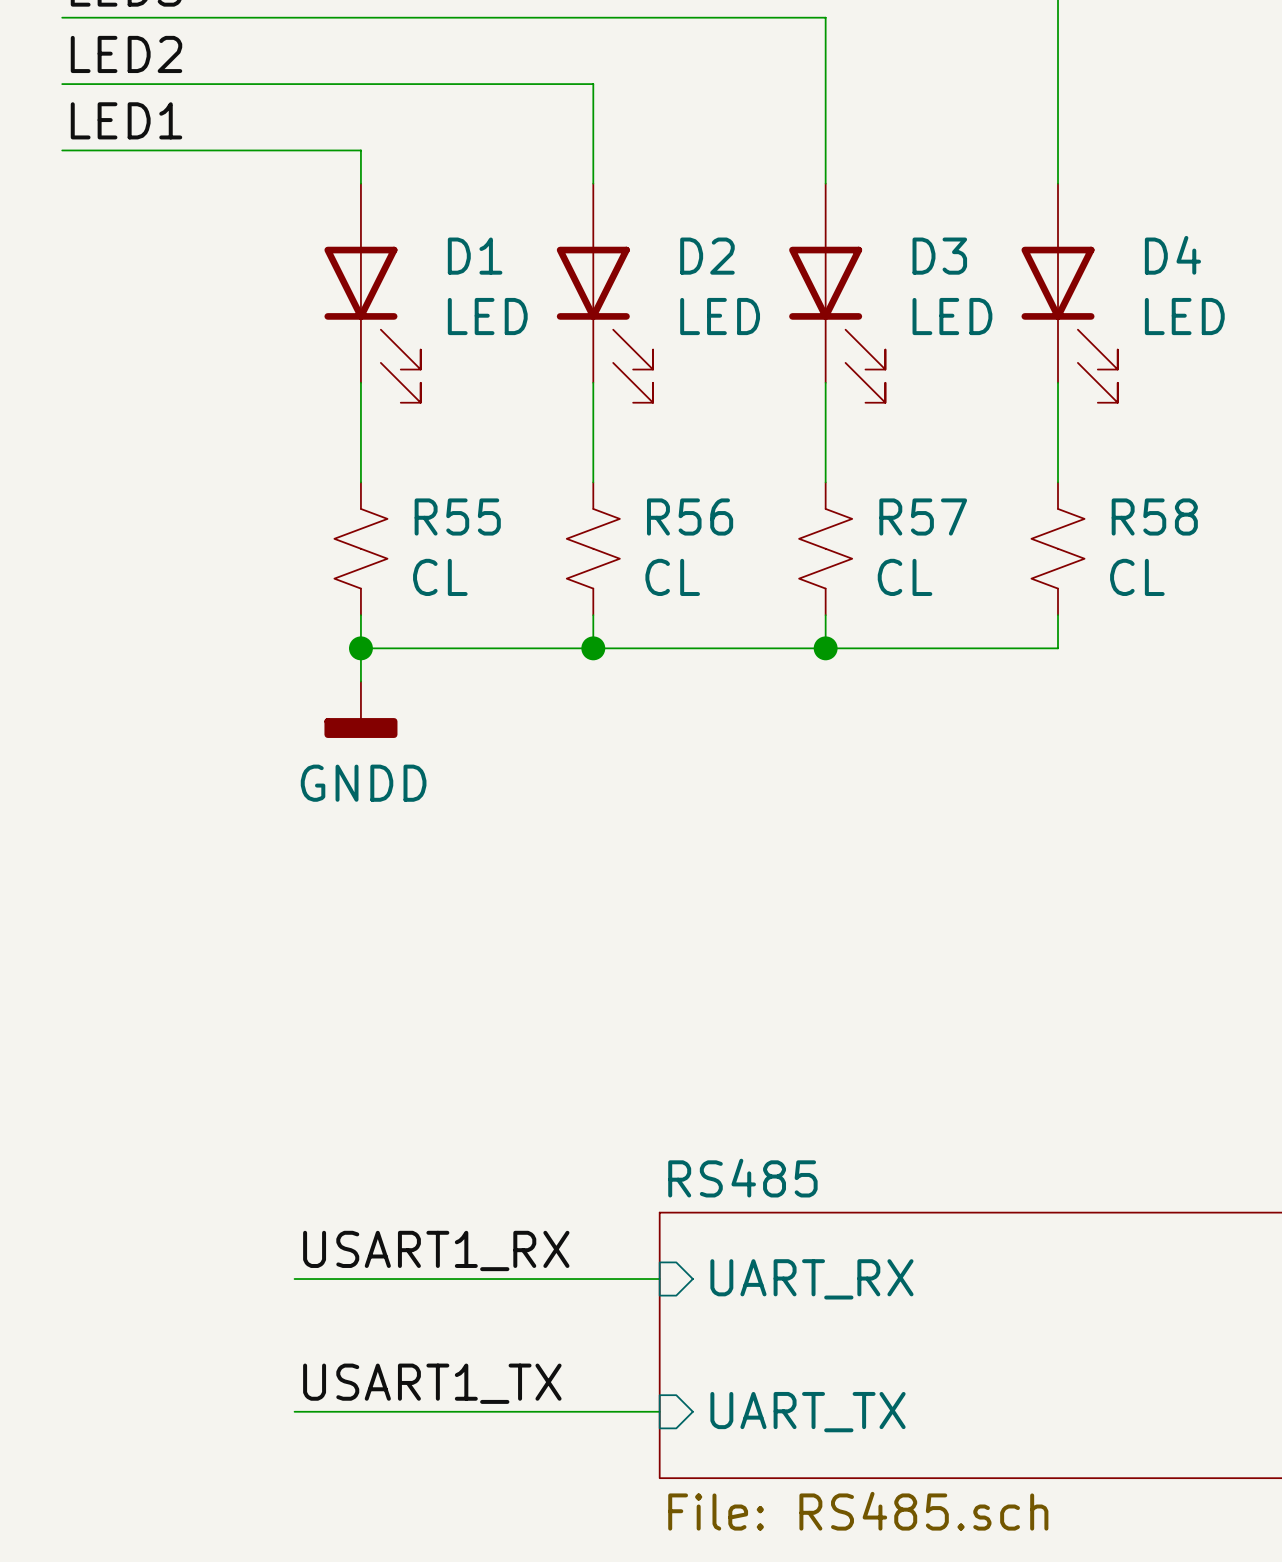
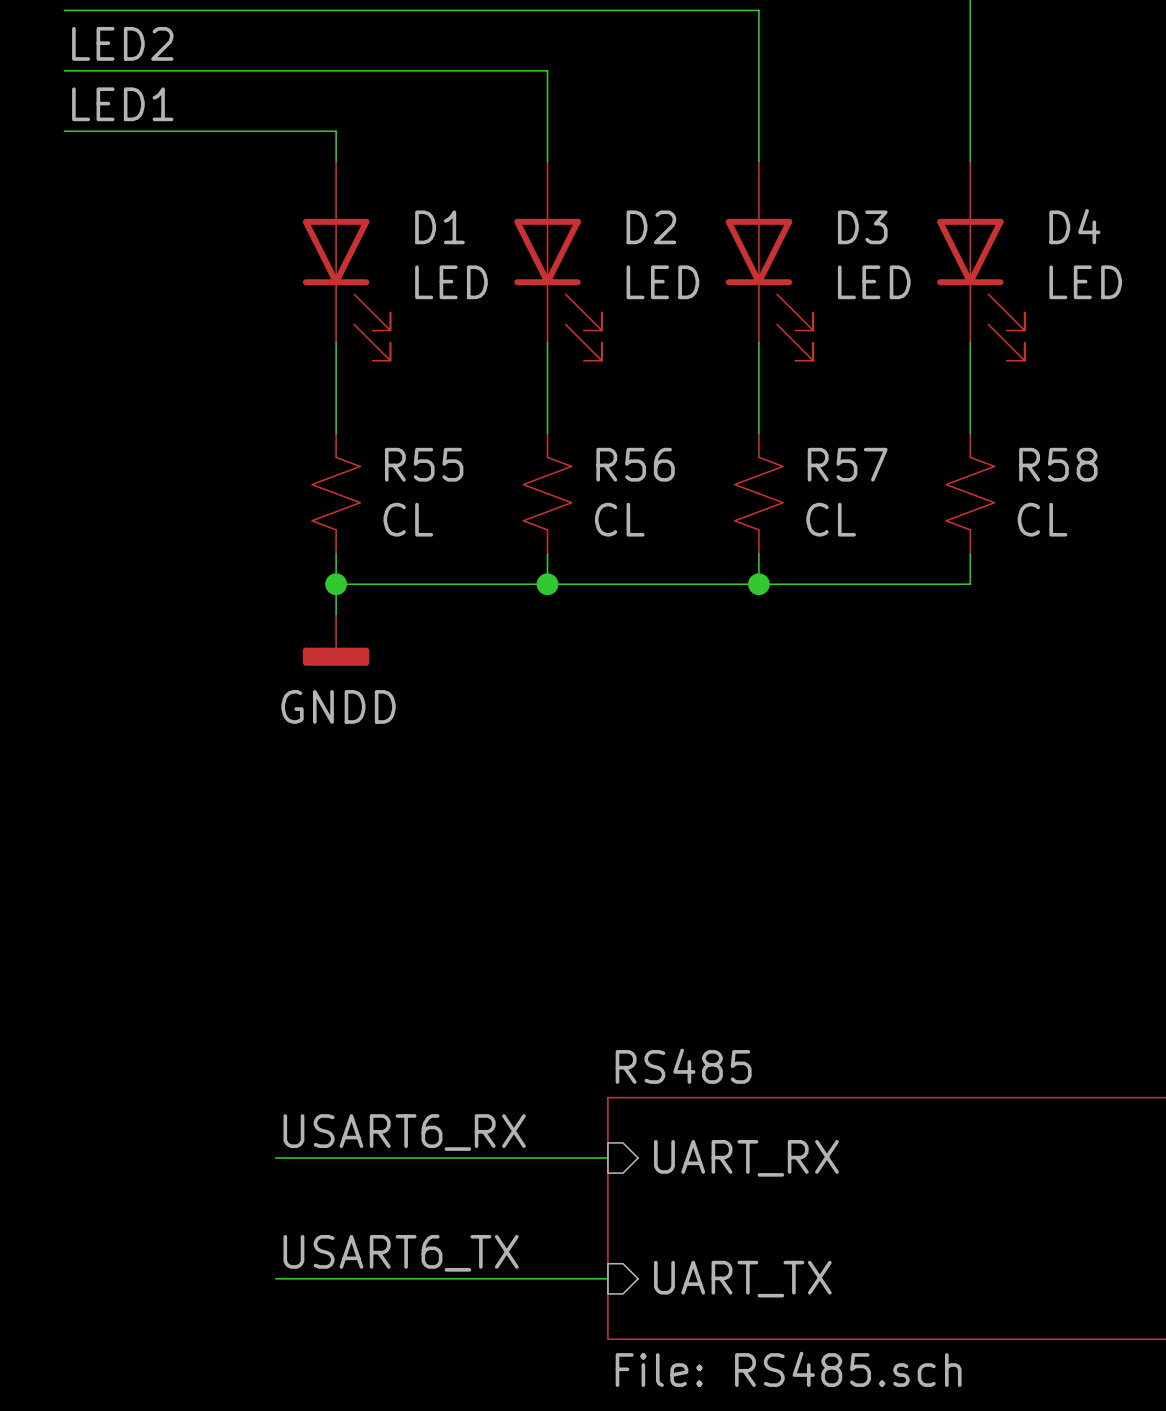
label: USART1_RX (436, 1250) -> USART6_RX (404, 1132)
label: USART1_TX (432, 1383) -> USART6_TX (401, 1253)

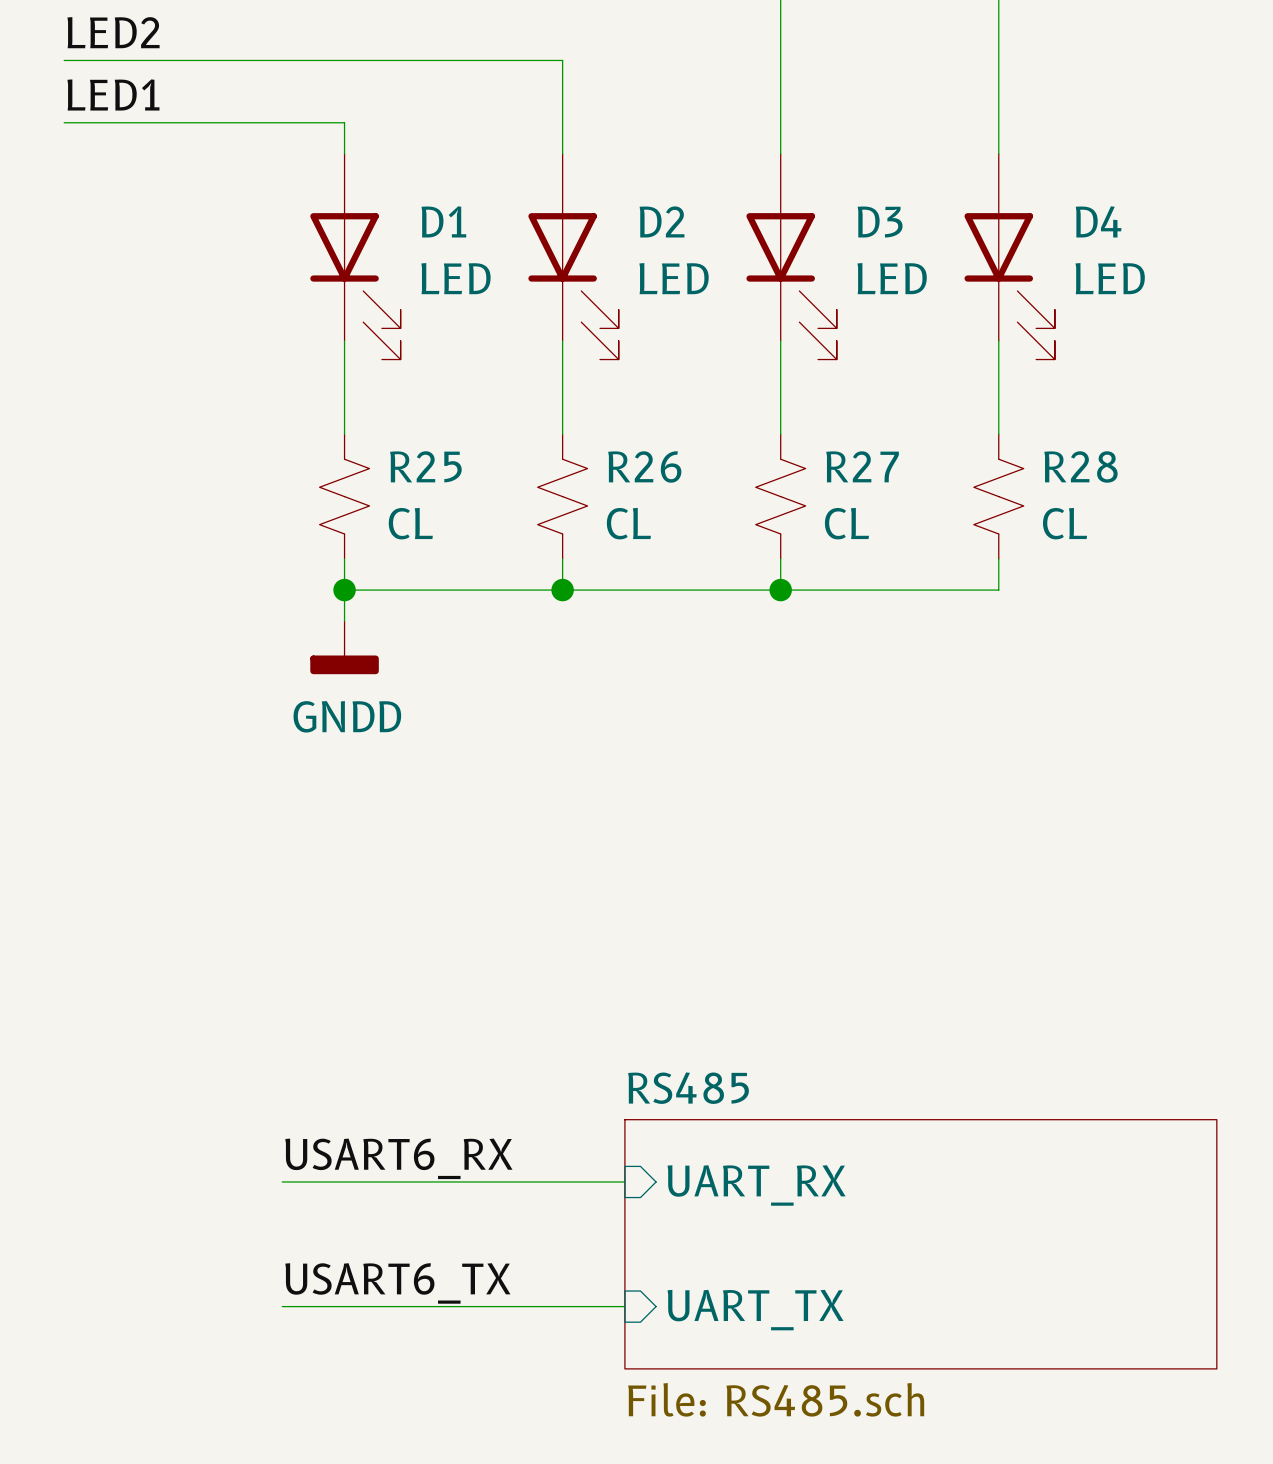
R55 name: R55 (424, 464) -> R25 (425, 466)
R56 name: R56 (635, 464) -> R26 (644, 466)
R57 name: R57 (847, 464) -> R27 (862, 466)
R58 name: R58 (1058, 464) -> R28 (1080, 466)

